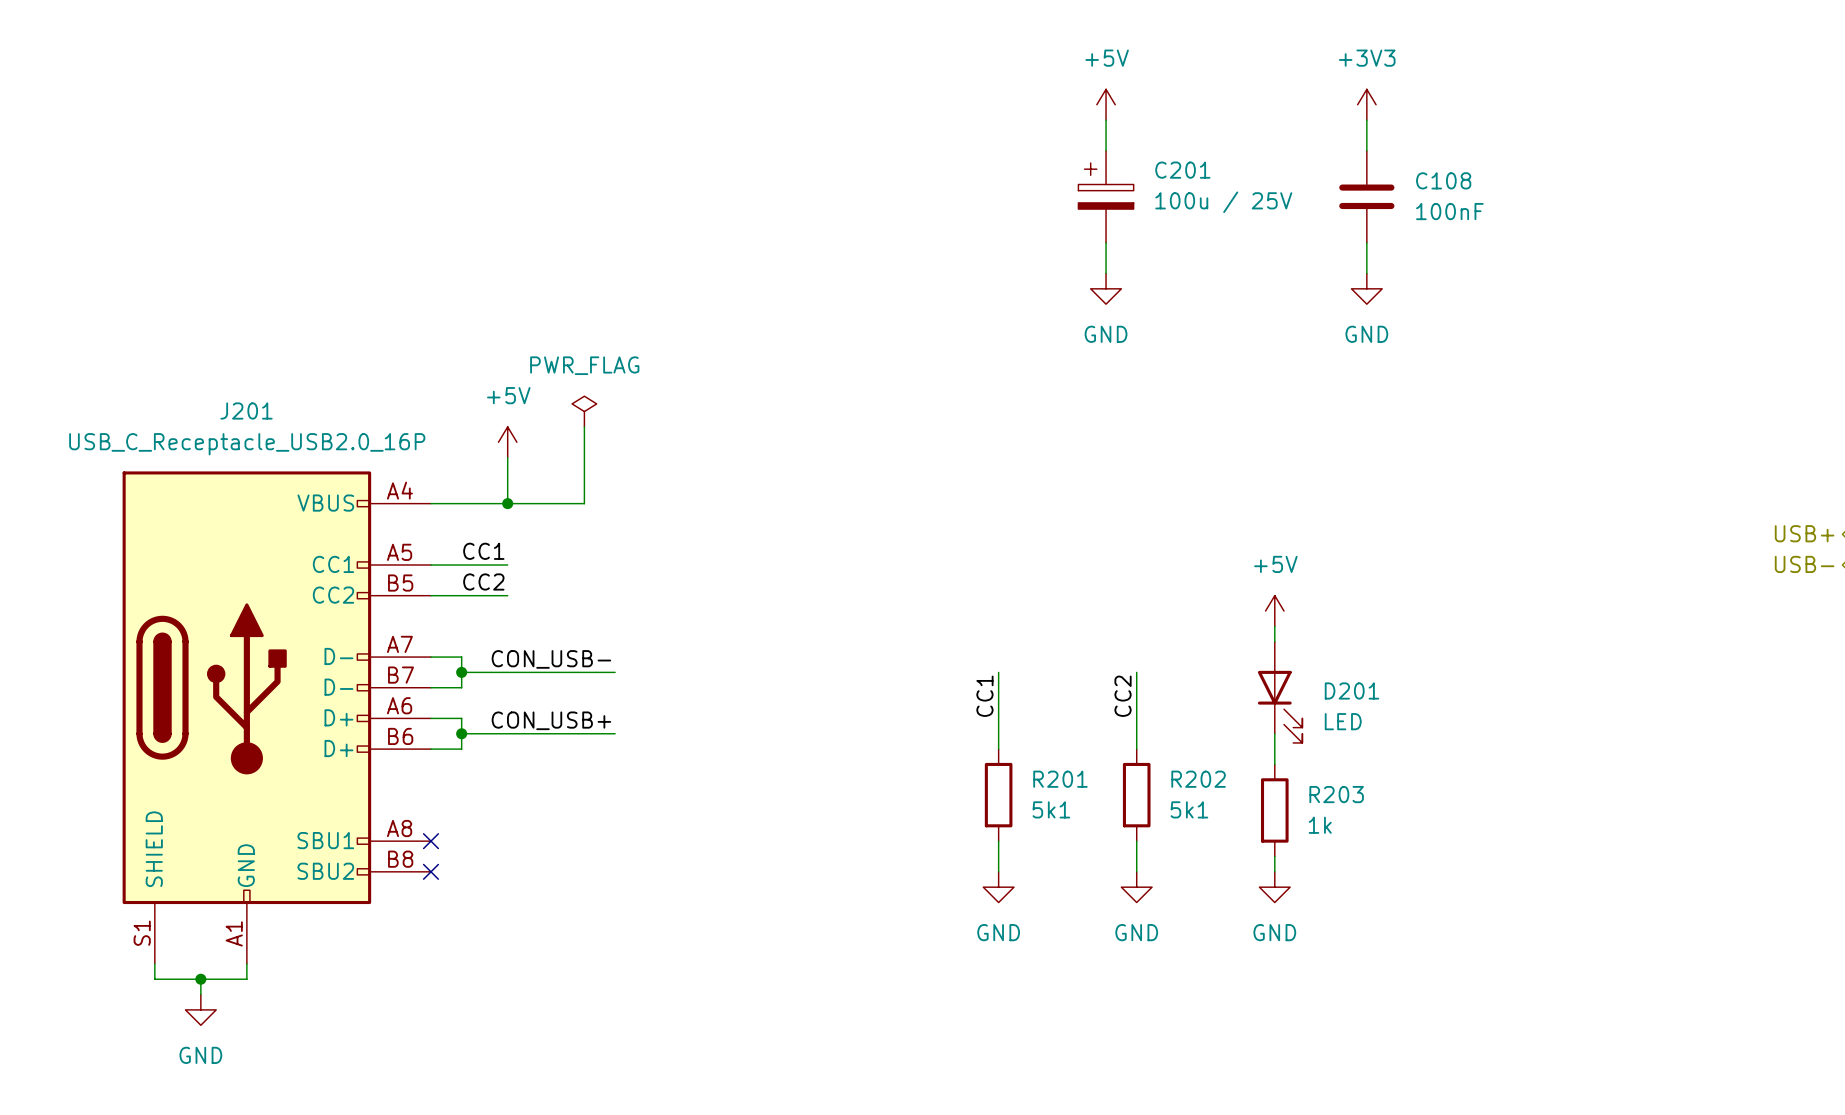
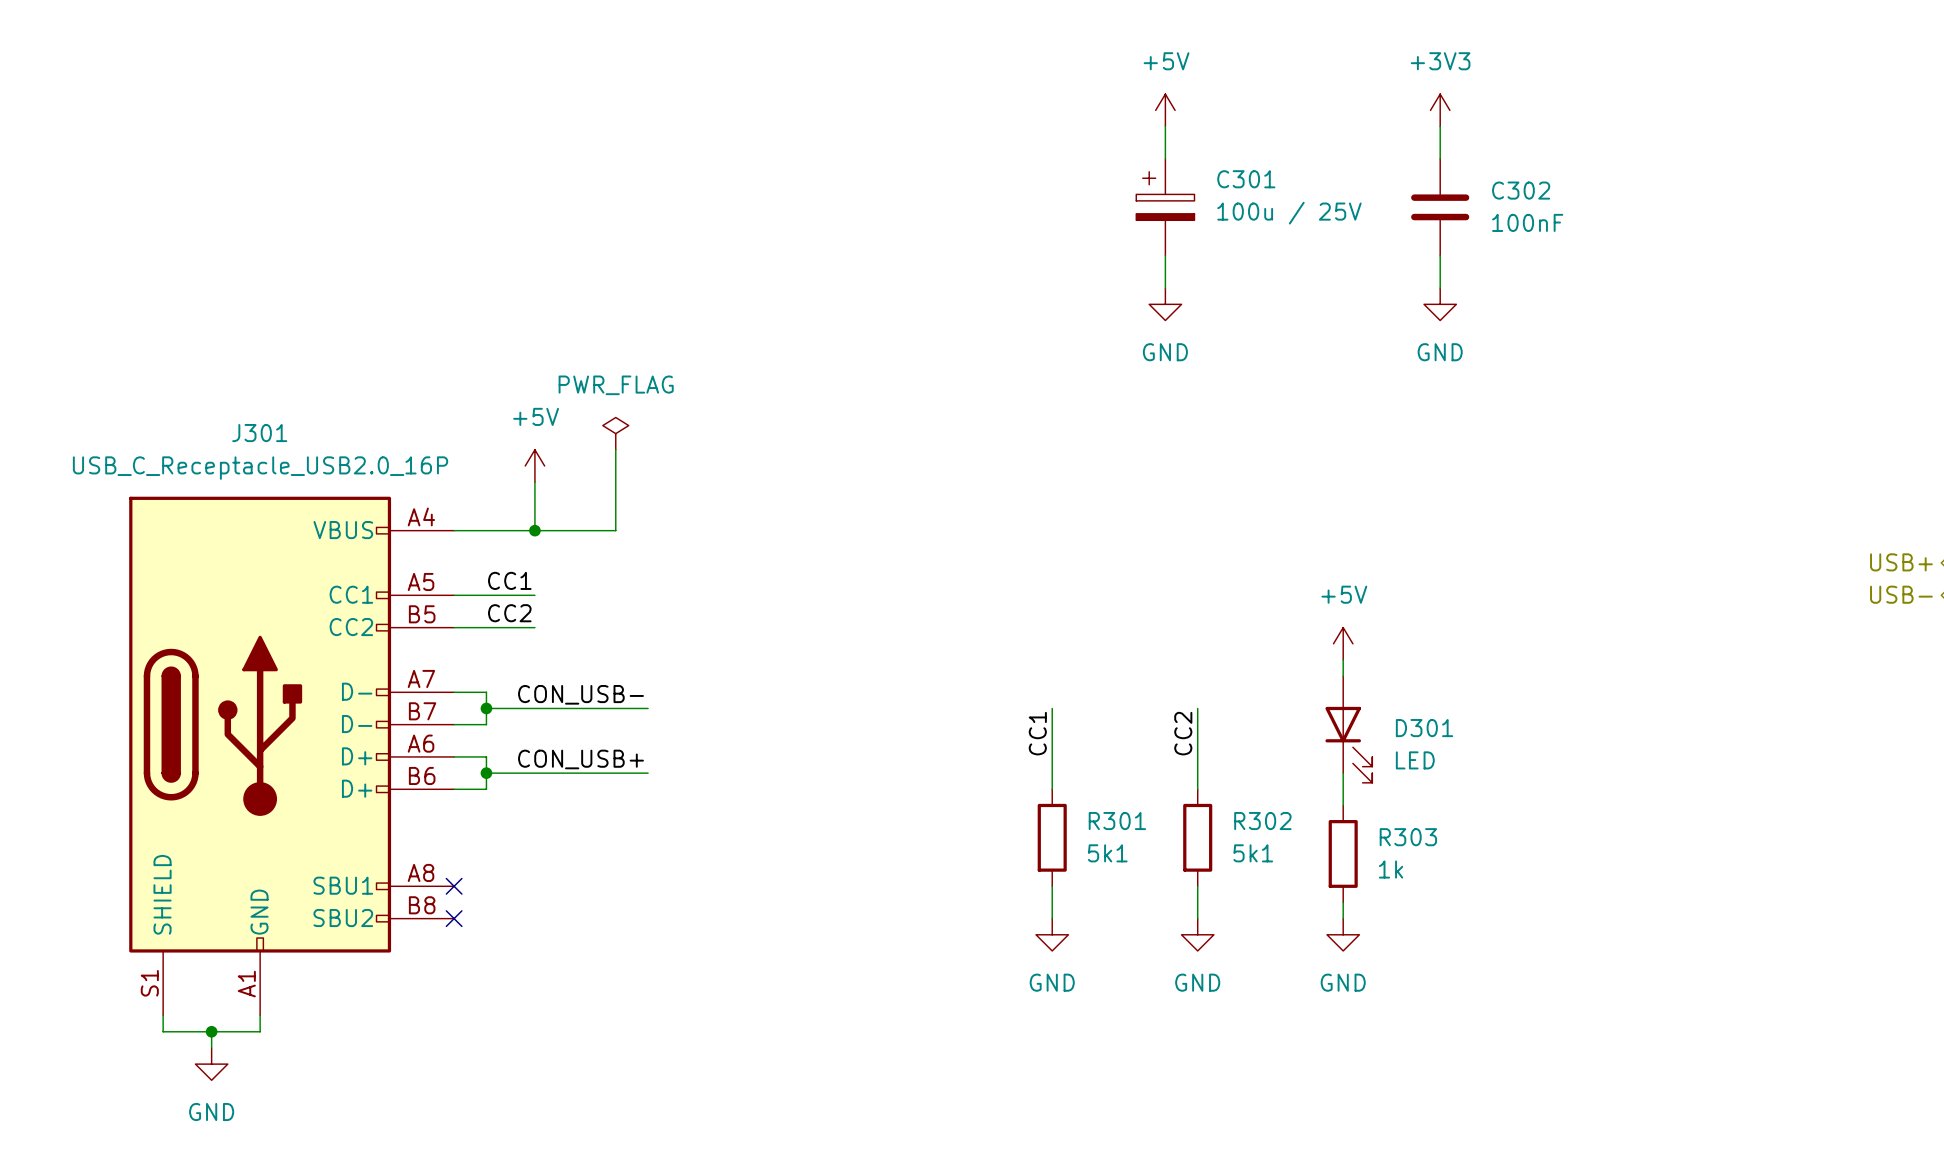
C201 name: C201 (1182, 170) -> C301 (1246, 179)
C108 name: C108 (1443, 180) -> C302 (1521, 190)
J201 name: J201 (246, 411) -> J301 (259, 433)
D201 name: D201 (1351, 690) -> D301 (1424, 728)
R201 name: R201 (1060, 779) -> R301 (1117, 821)
R202 name: R202 (1198, 779) -> R302 (1262, 821)
R203 name: R203 (1336, 794) -> R303 (1408, 837)

